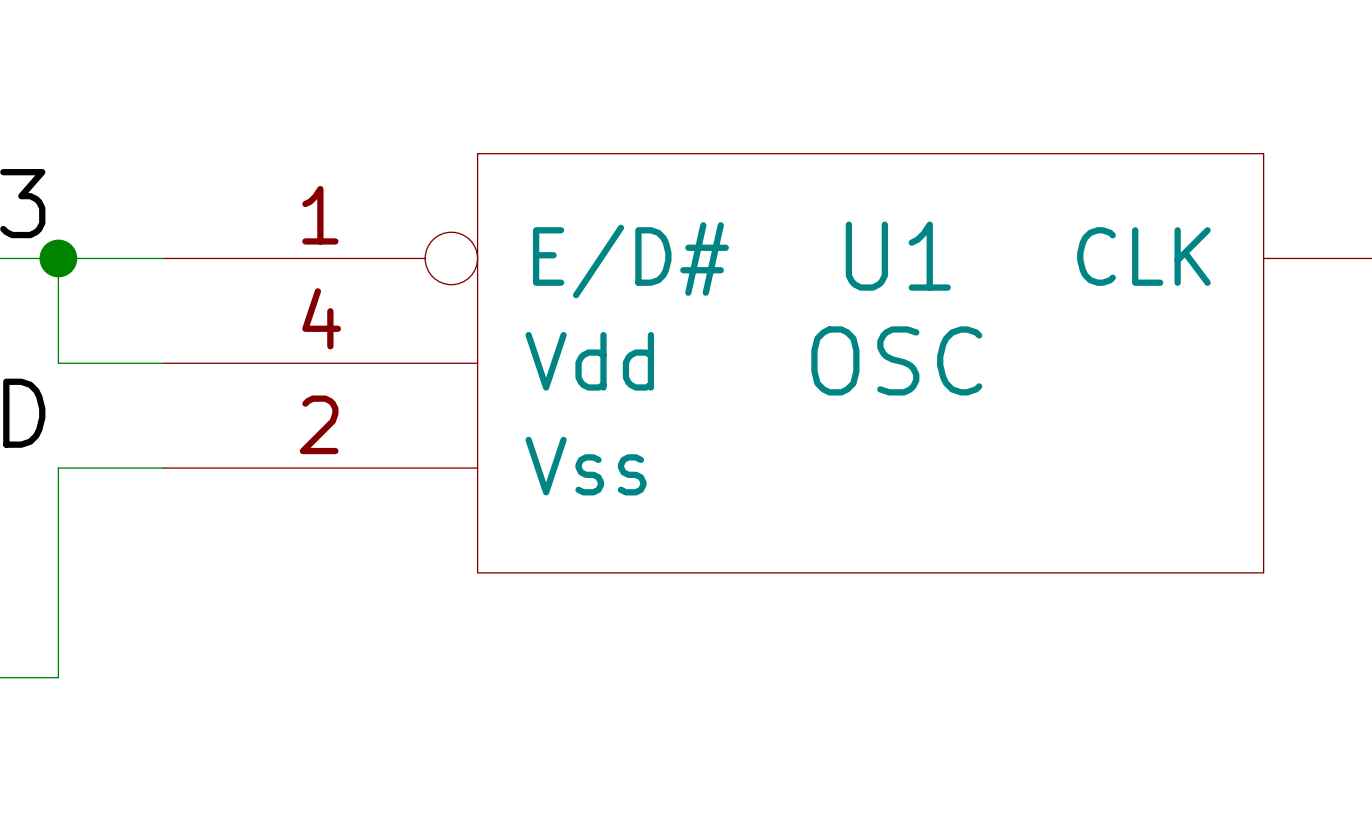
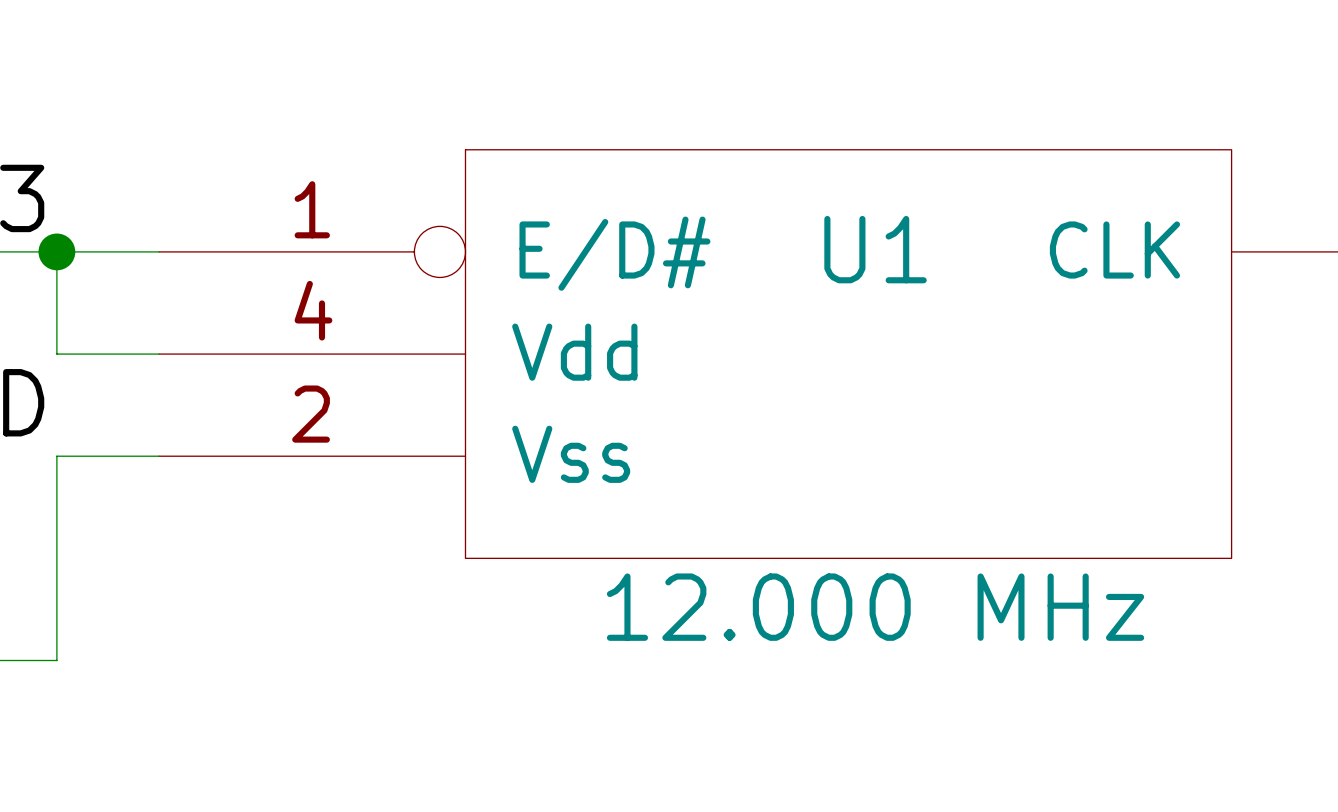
U1 value: OSC (896, 360) -> 12.000 MHz (875, 607)

